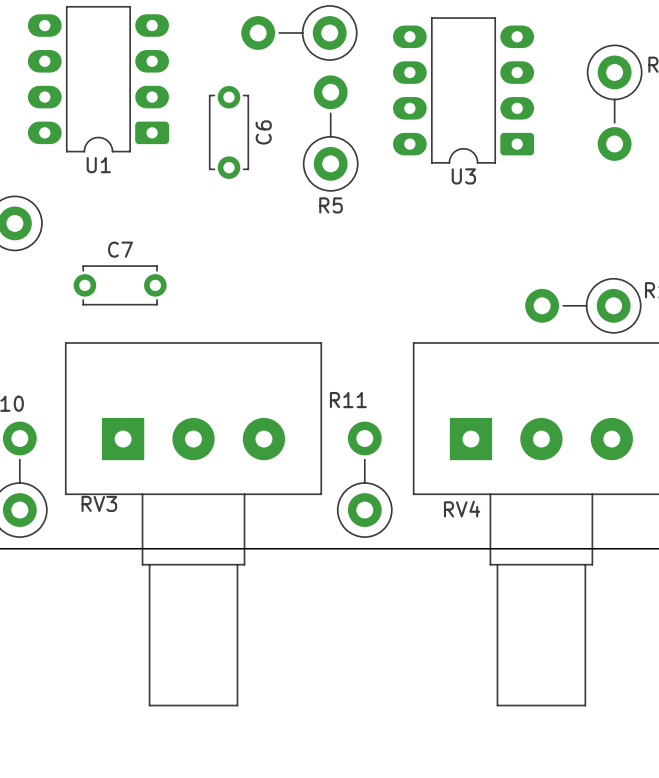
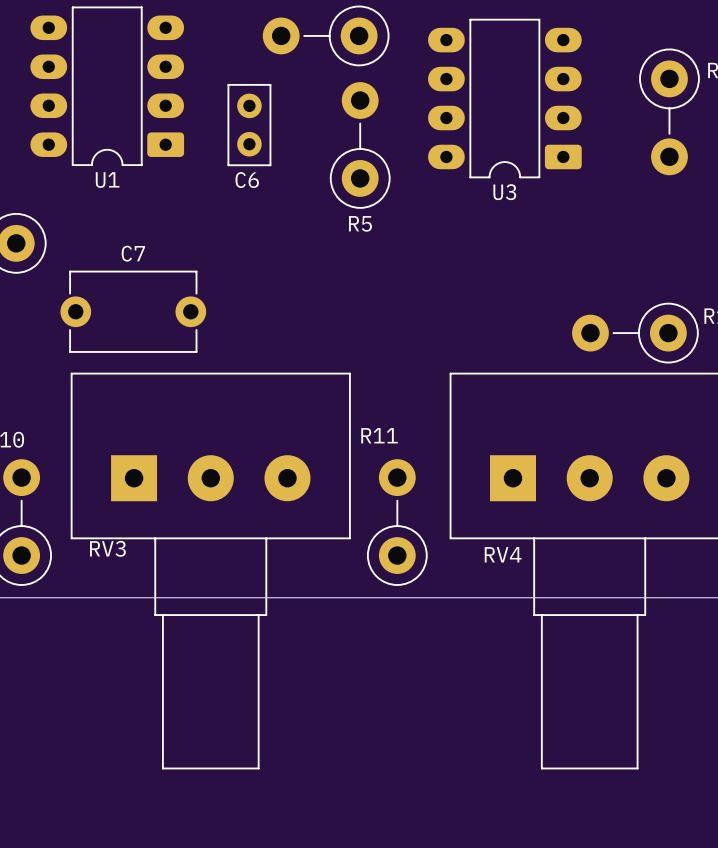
C6 footprint: [208, 85, 250, 179] -> [227, 83, 272, 167]
C6 name position: C6 (263, 132) -> C6 (247, 180)
C7 footprint: [73, 265, 167, 306] -> [60, 270, 207, 353]

